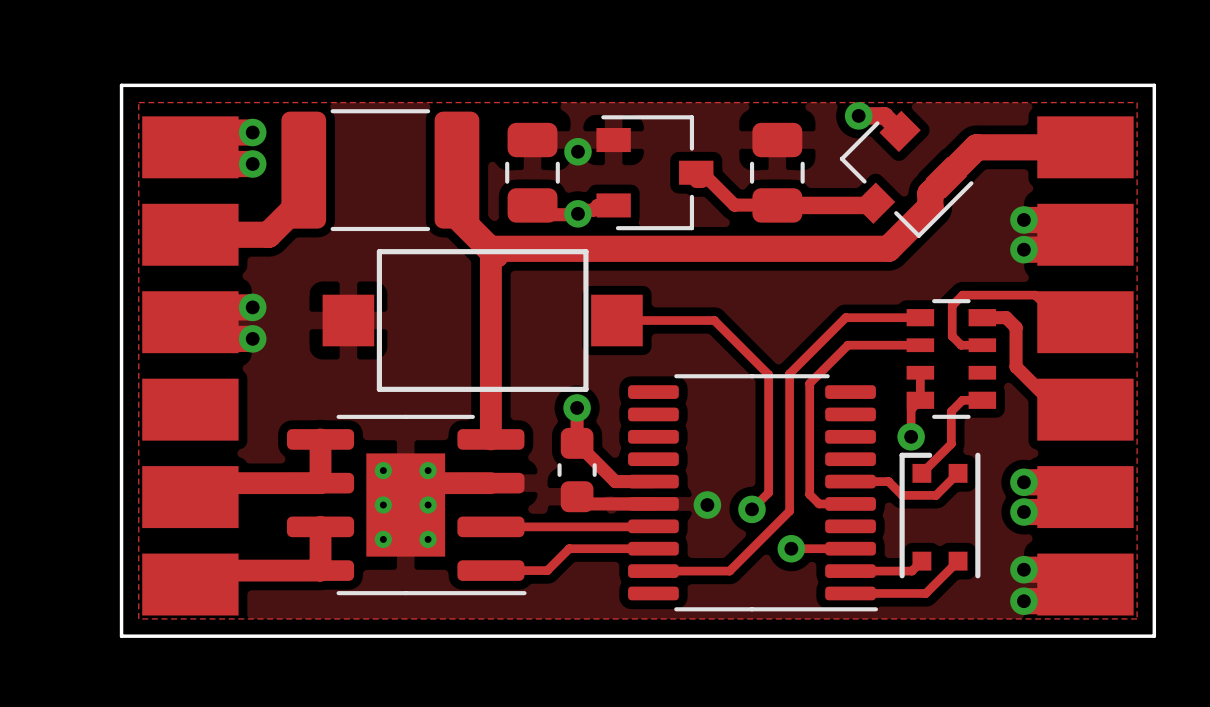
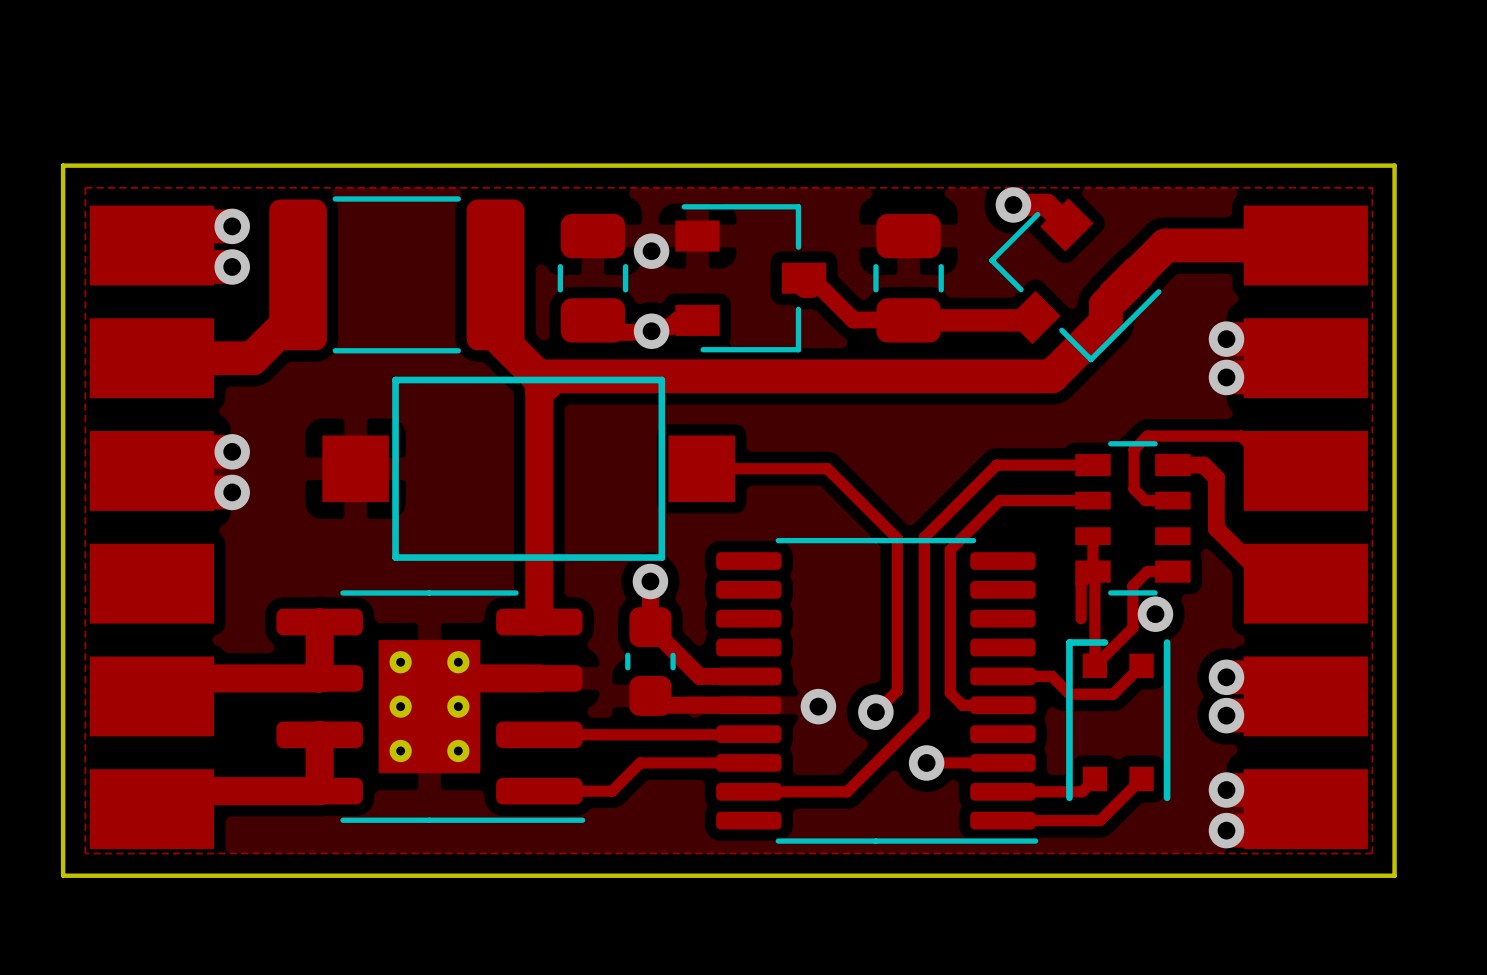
track: none -> (1092, 571) (1094, 573) (1094, 665)
via position: (911, 436) -> (1155, 614)

